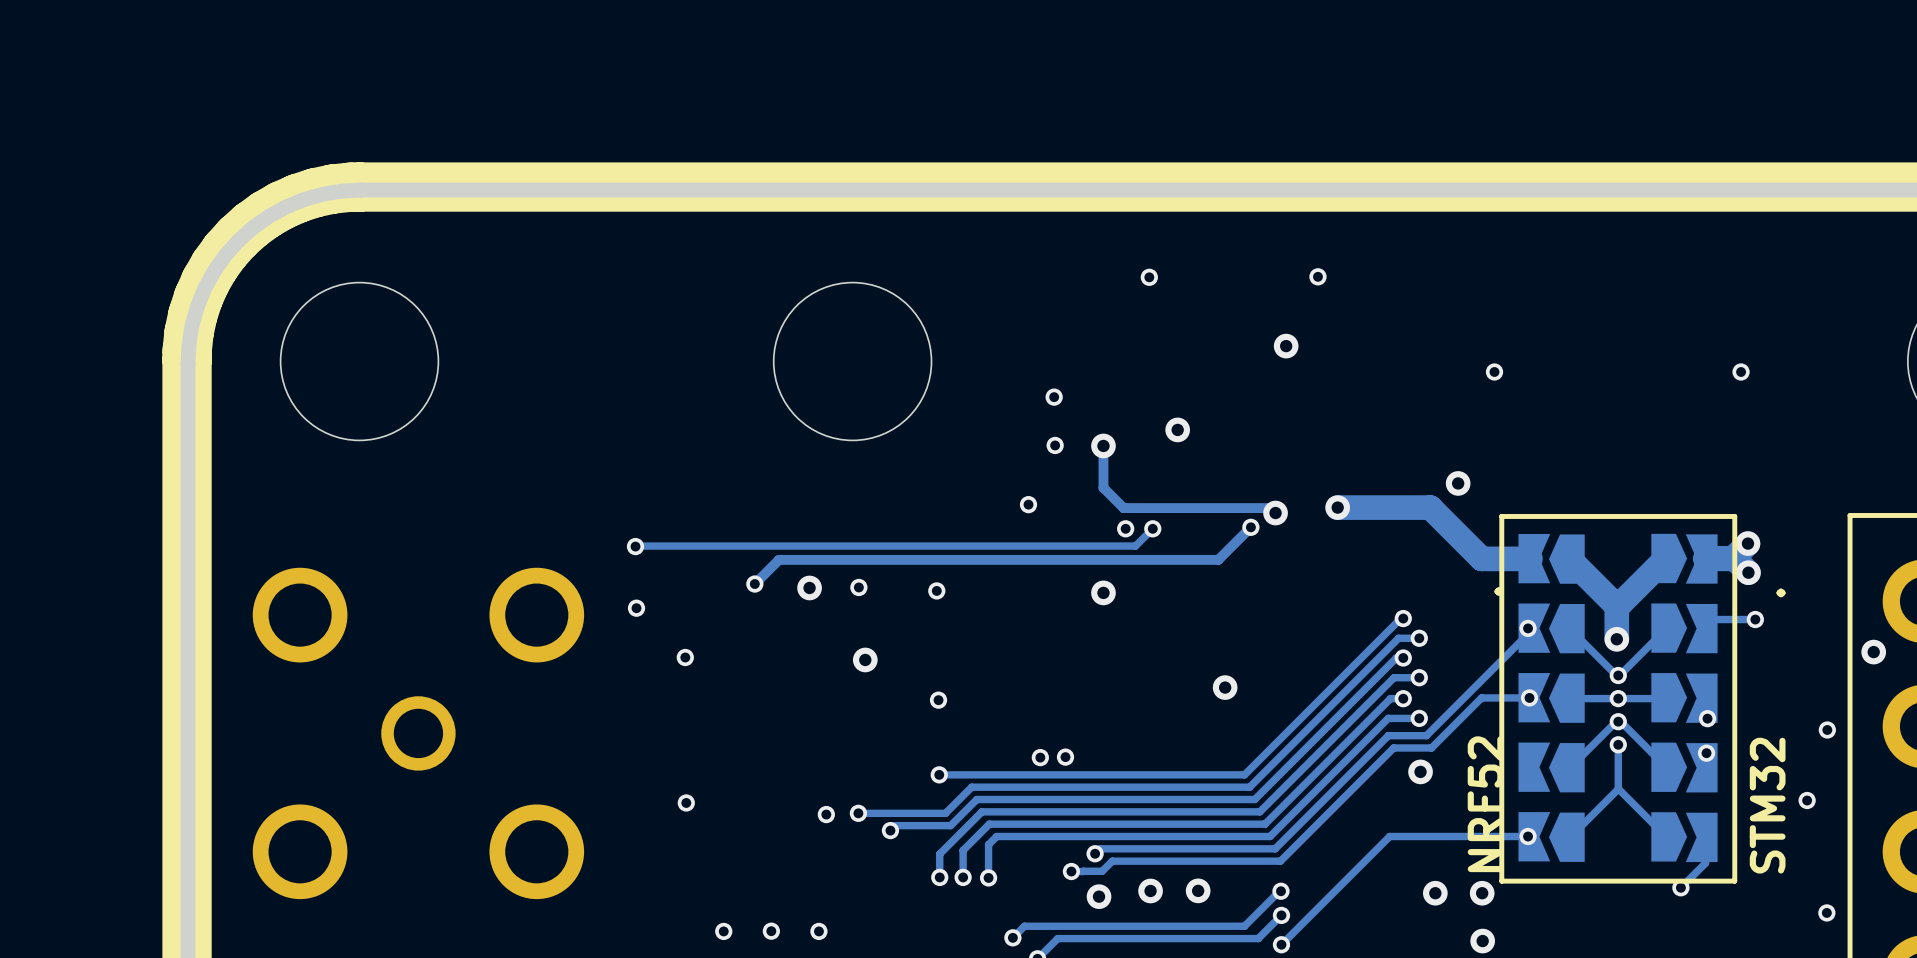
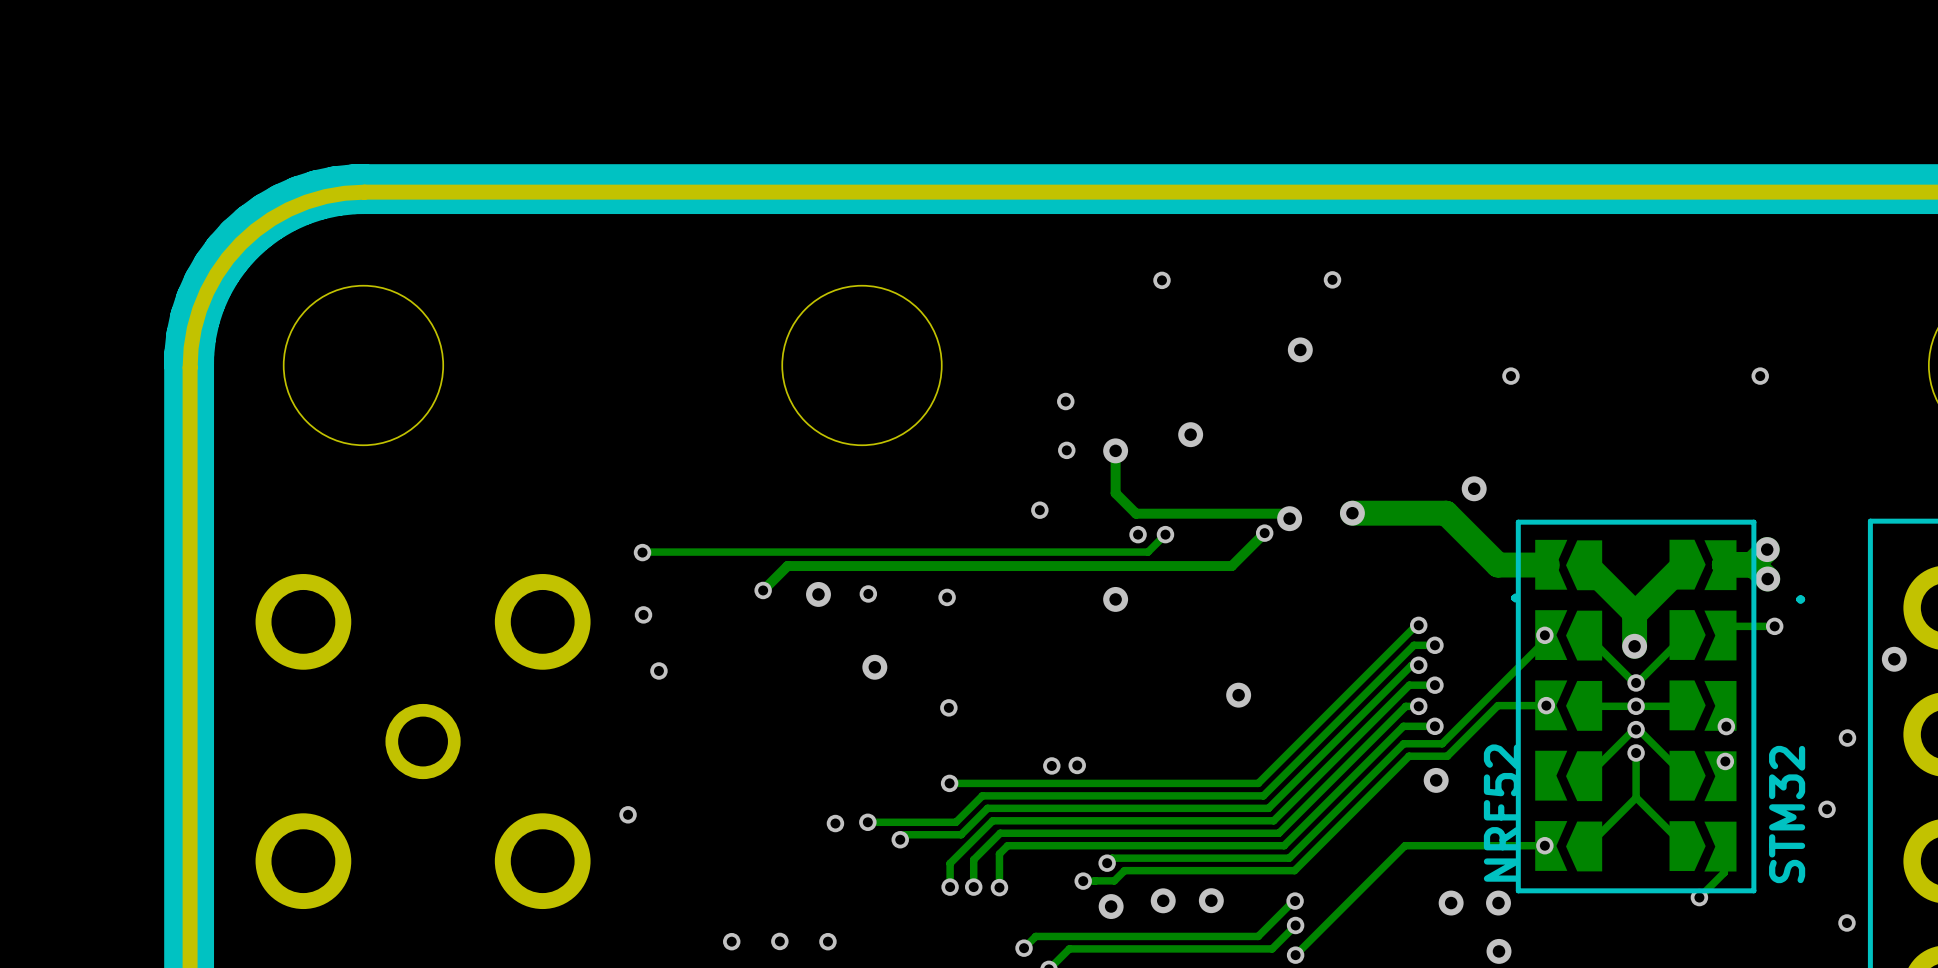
via position: (685, 657) -> (658, 670)
via position: (686, 802) -> (628, 814)

